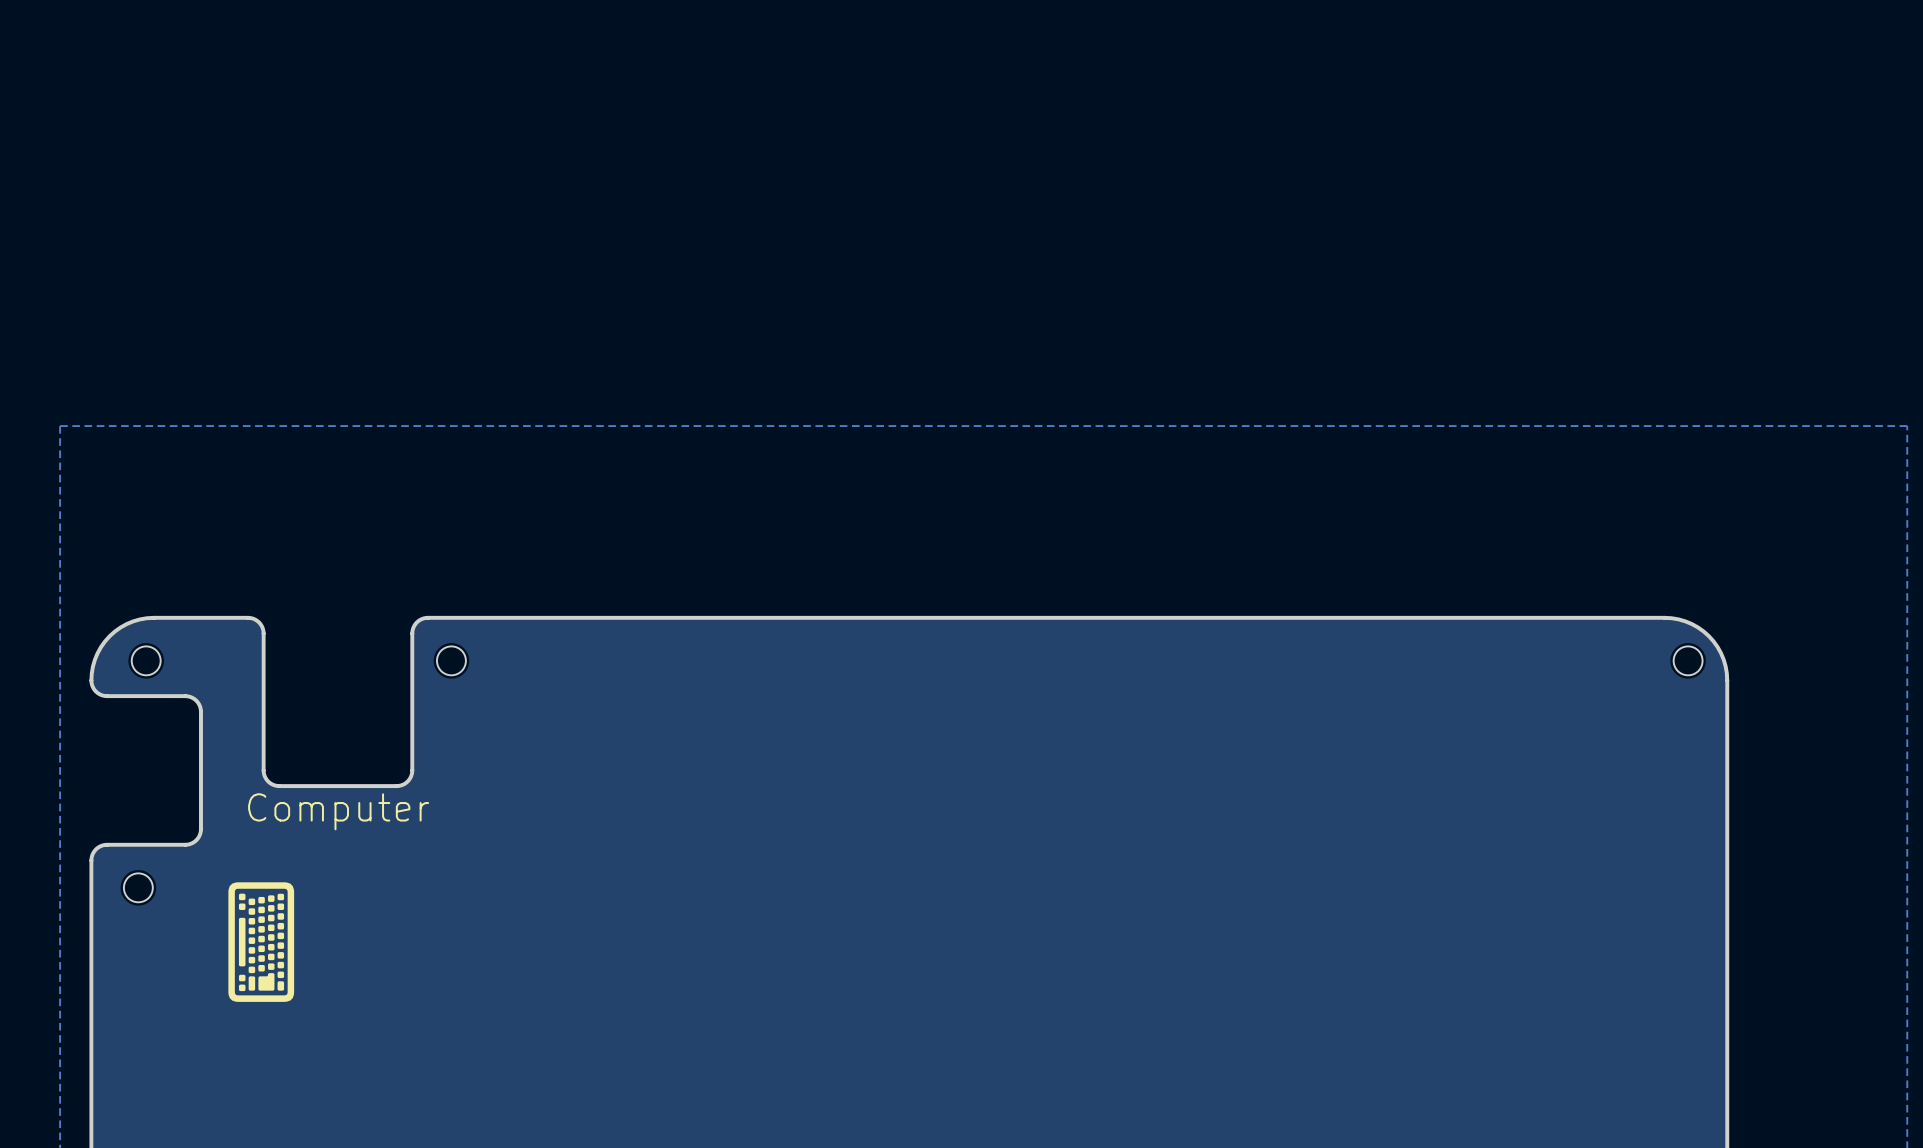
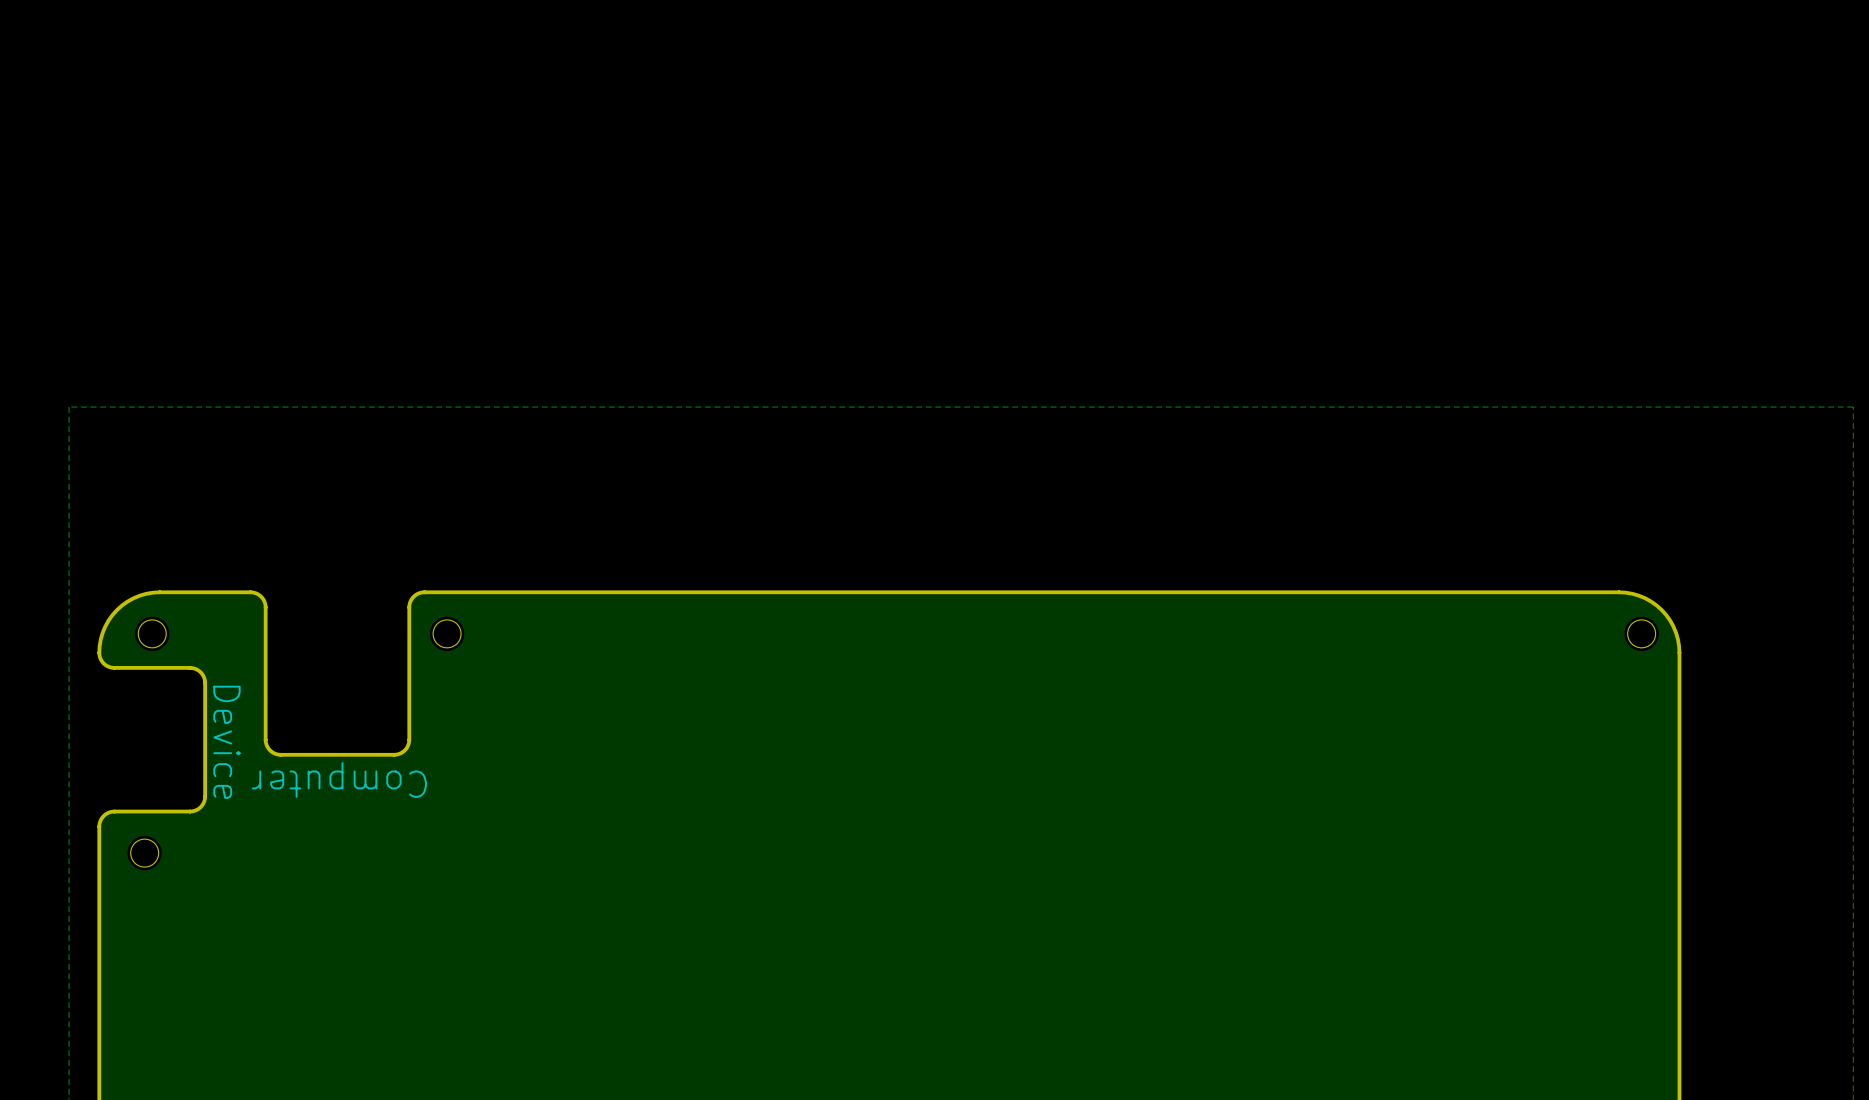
text: none -> Device (226, 742)
text rotation: 0° (338, 811) -> 180° (339, 779)
text: ⌨️ (261, 942) -> none

